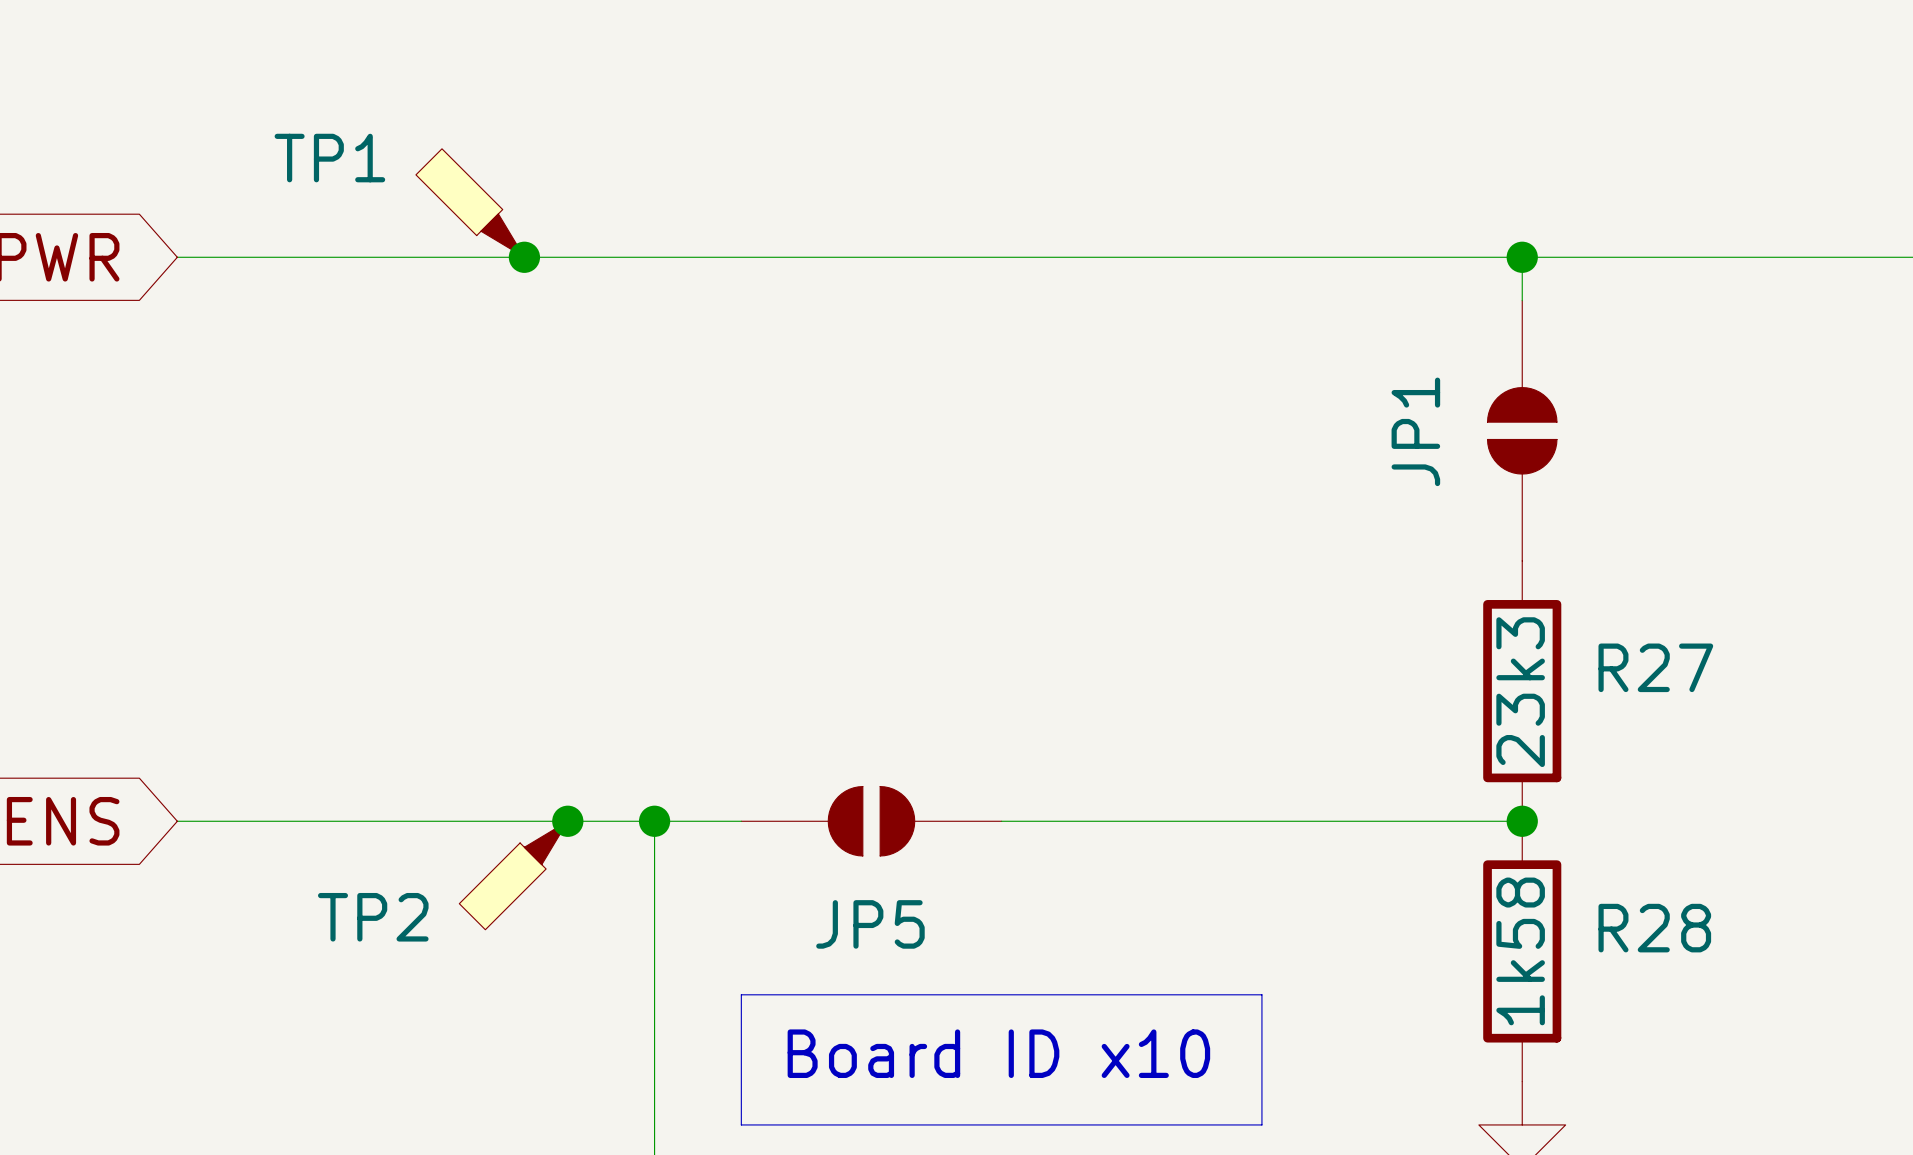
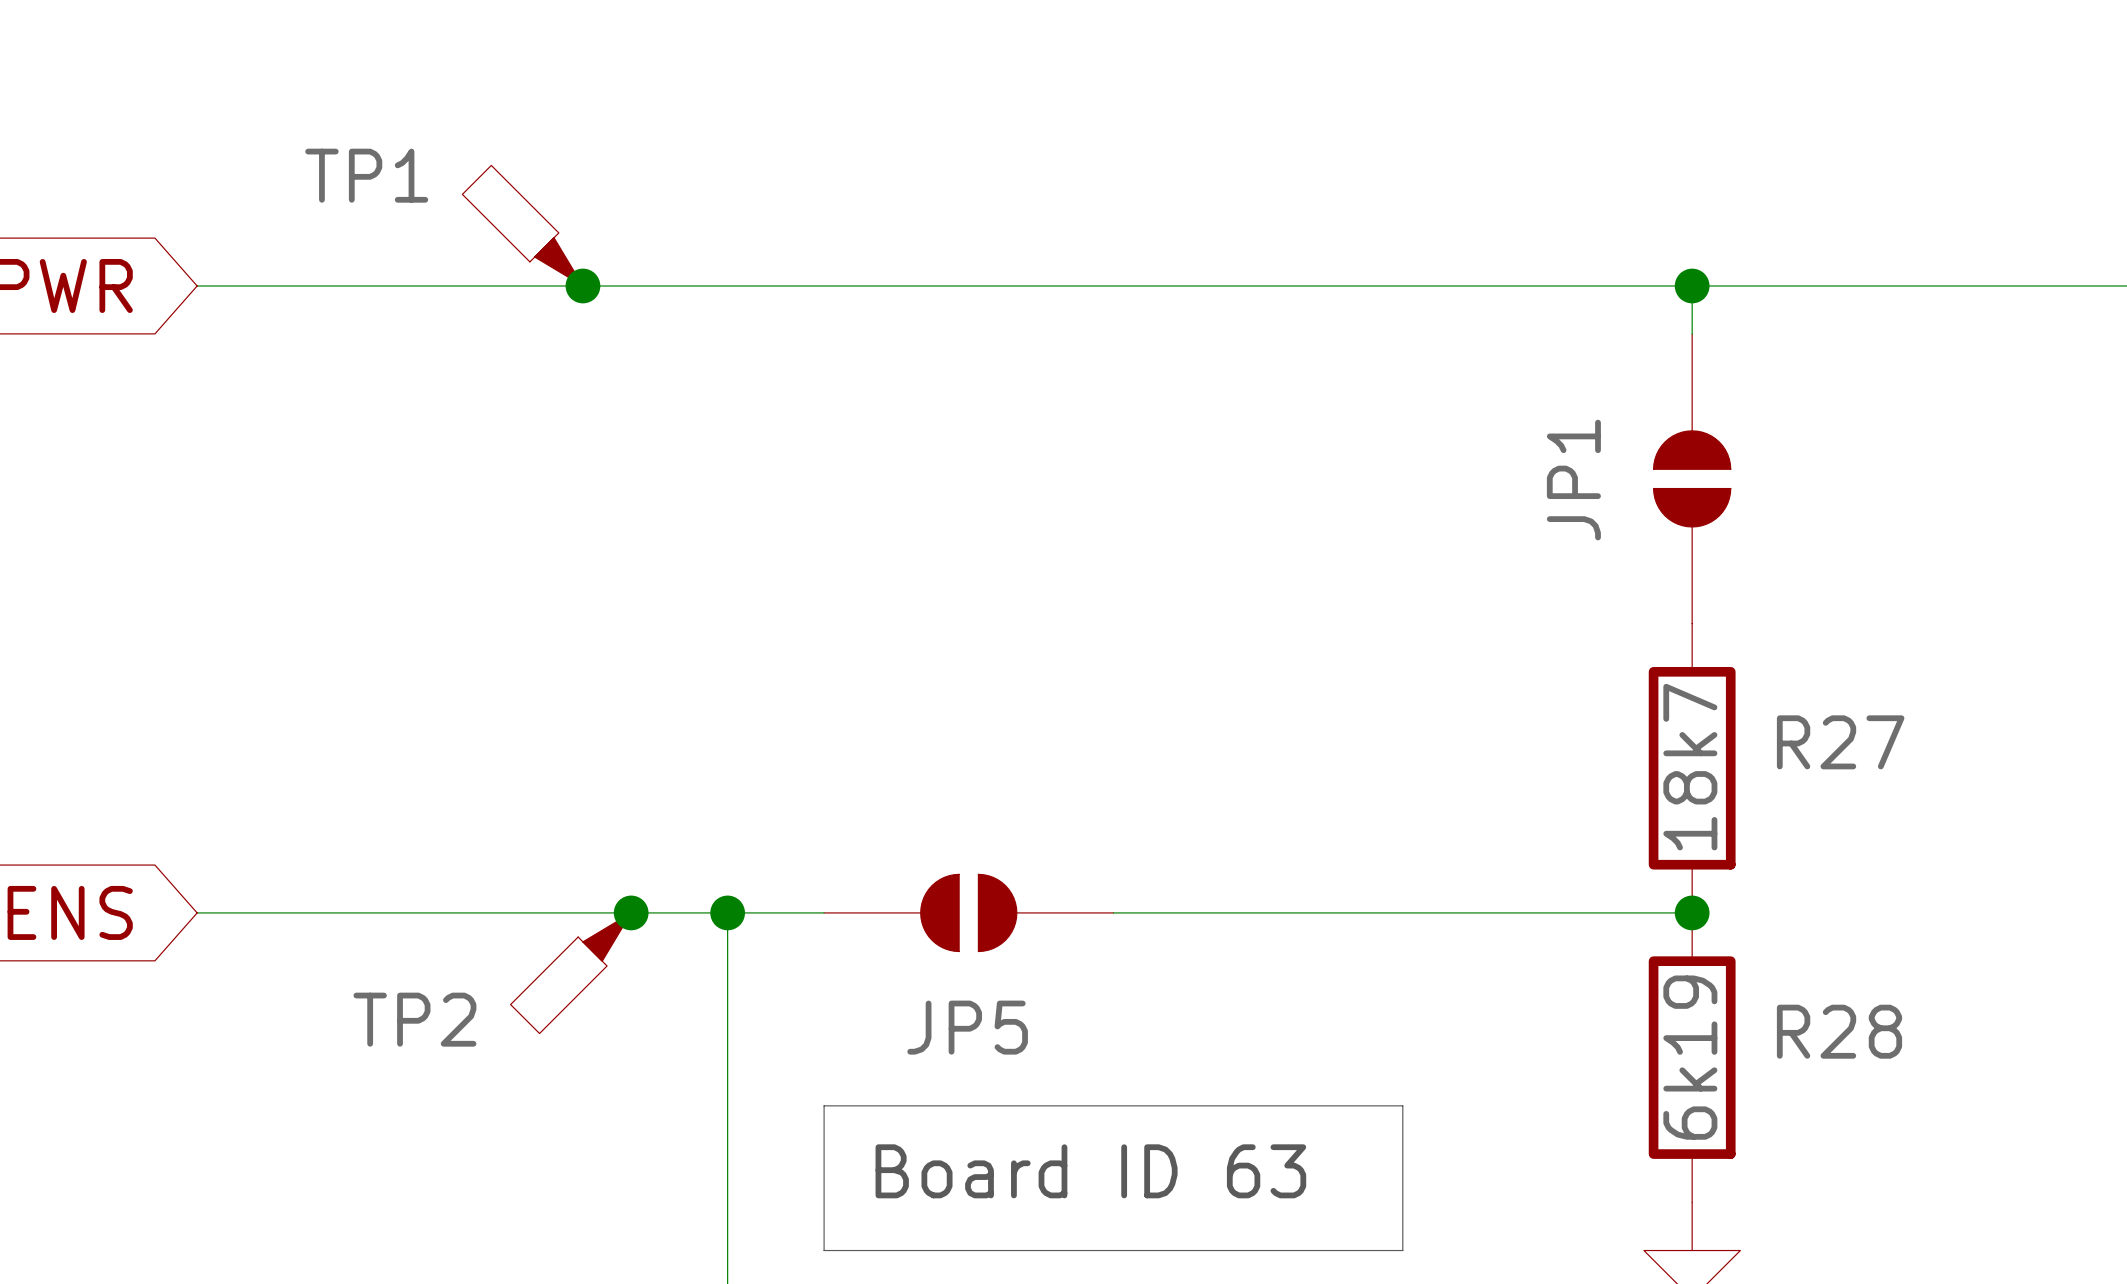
R27 value: 23k3 (1520, 692) -> 18k7 (1690, 767)
R28 value: 1k58 (1520, 951) -> 6k19 (1690, 1057)
text: Board ID x10 (998, 1053) -> Board ID 63 (1090, 1171)

